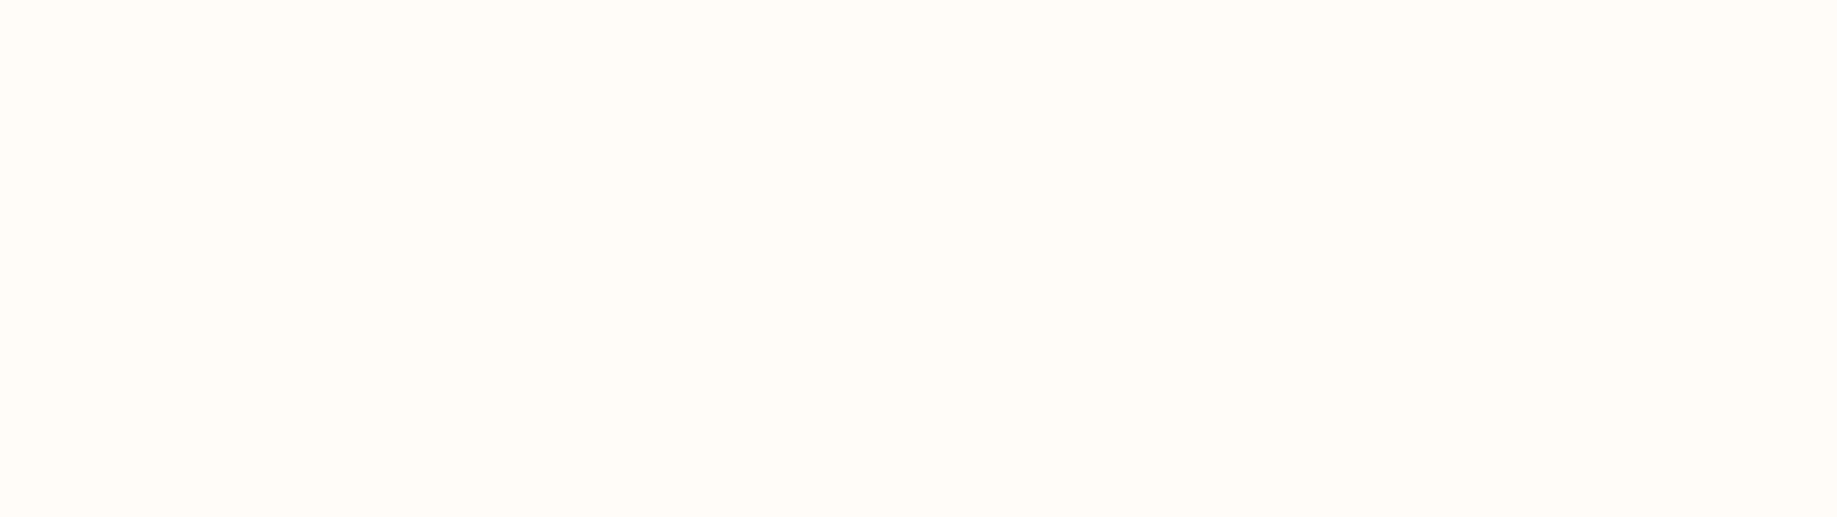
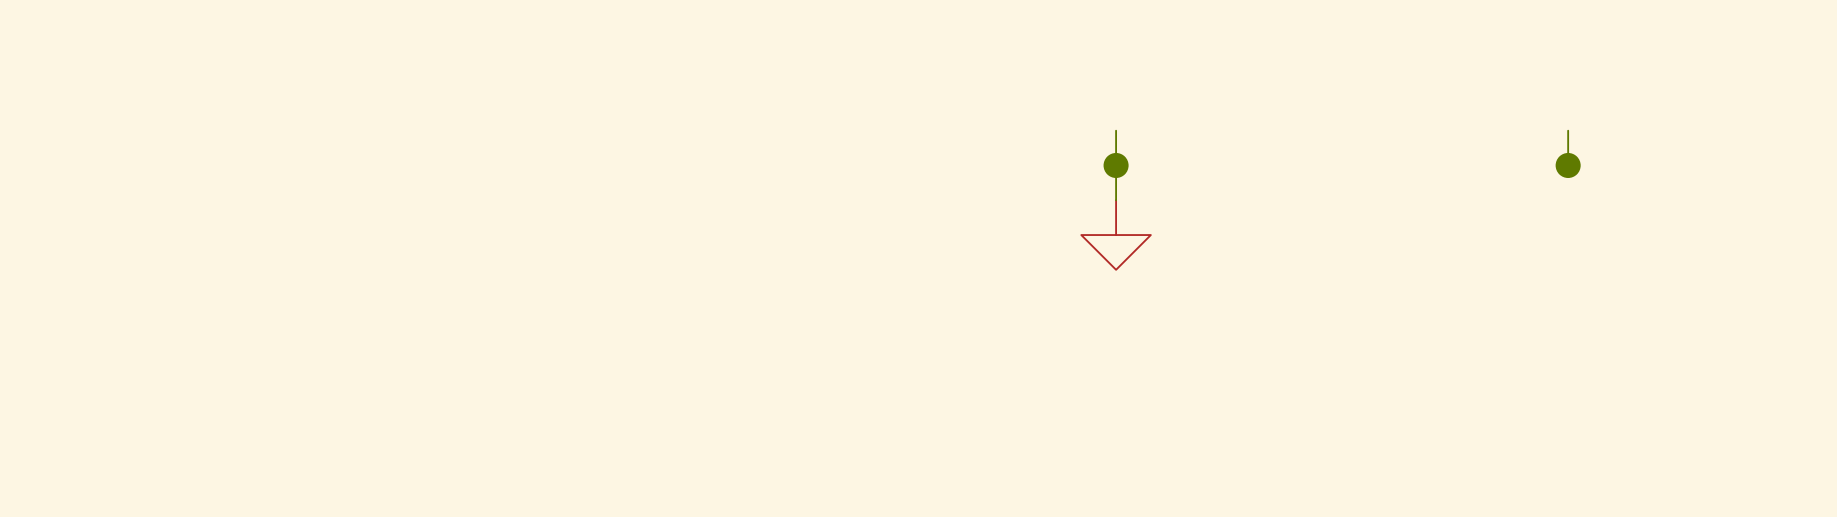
wire: none -> (1116, 130) (1116, 200)
wire: none -> (1568, 130) (1568, 165)
junction: none -> (1116, 165)
junction: none -> (1568, 165)
power symbol: none -> (1116, 235)

